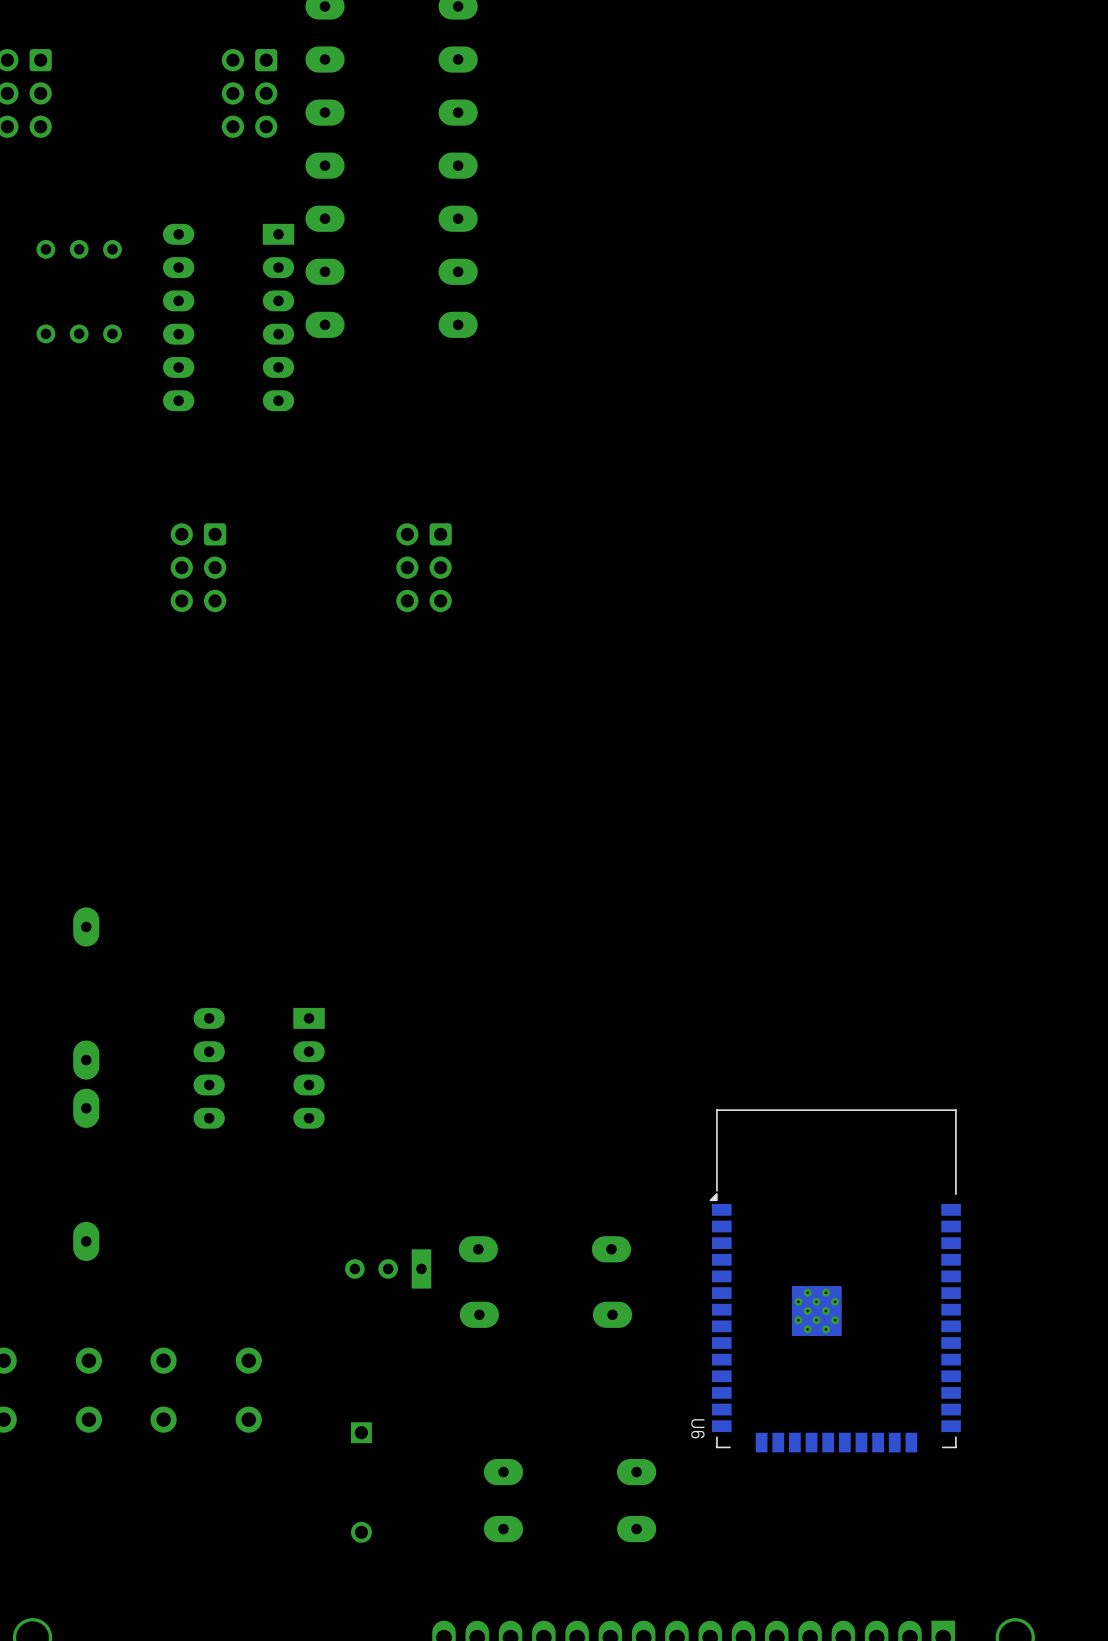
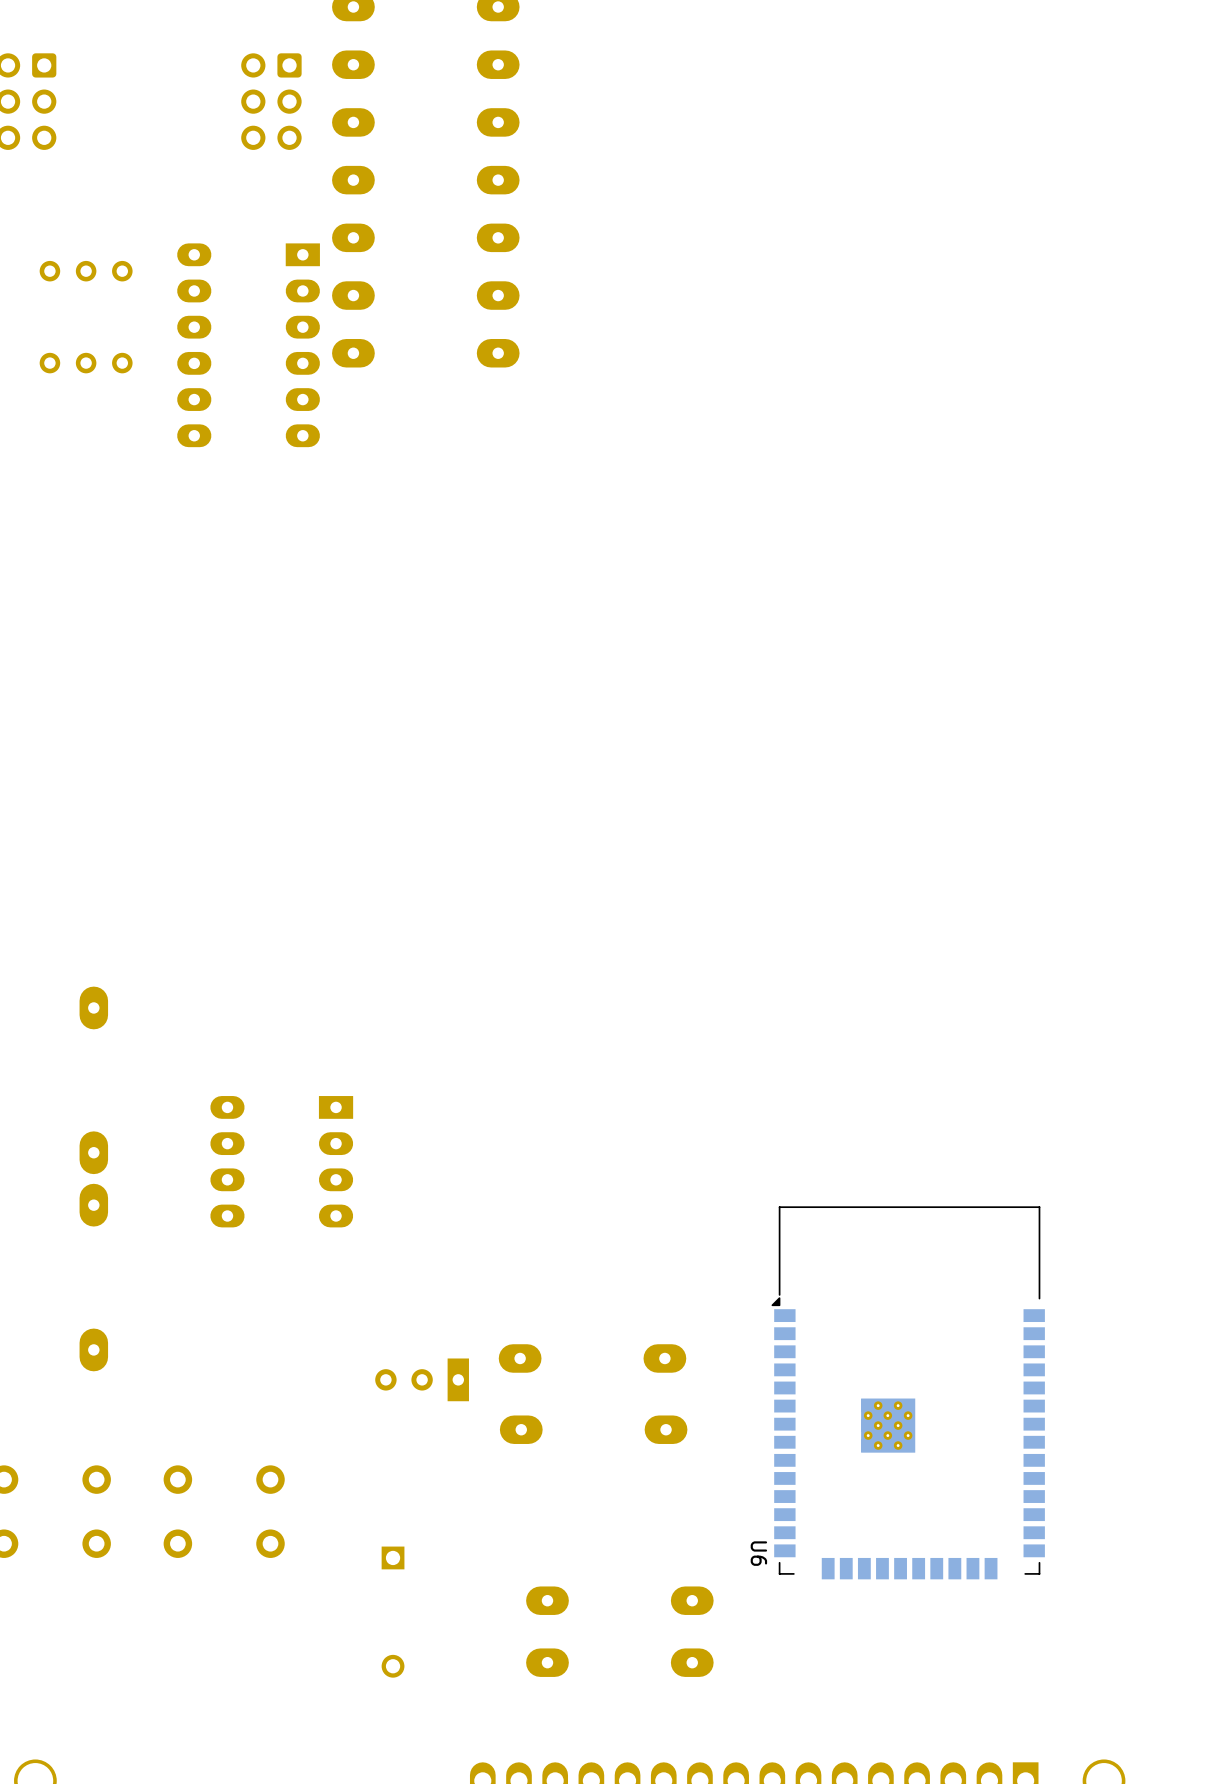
part: (198, 567) -> none
part: (424, 567) -> none

